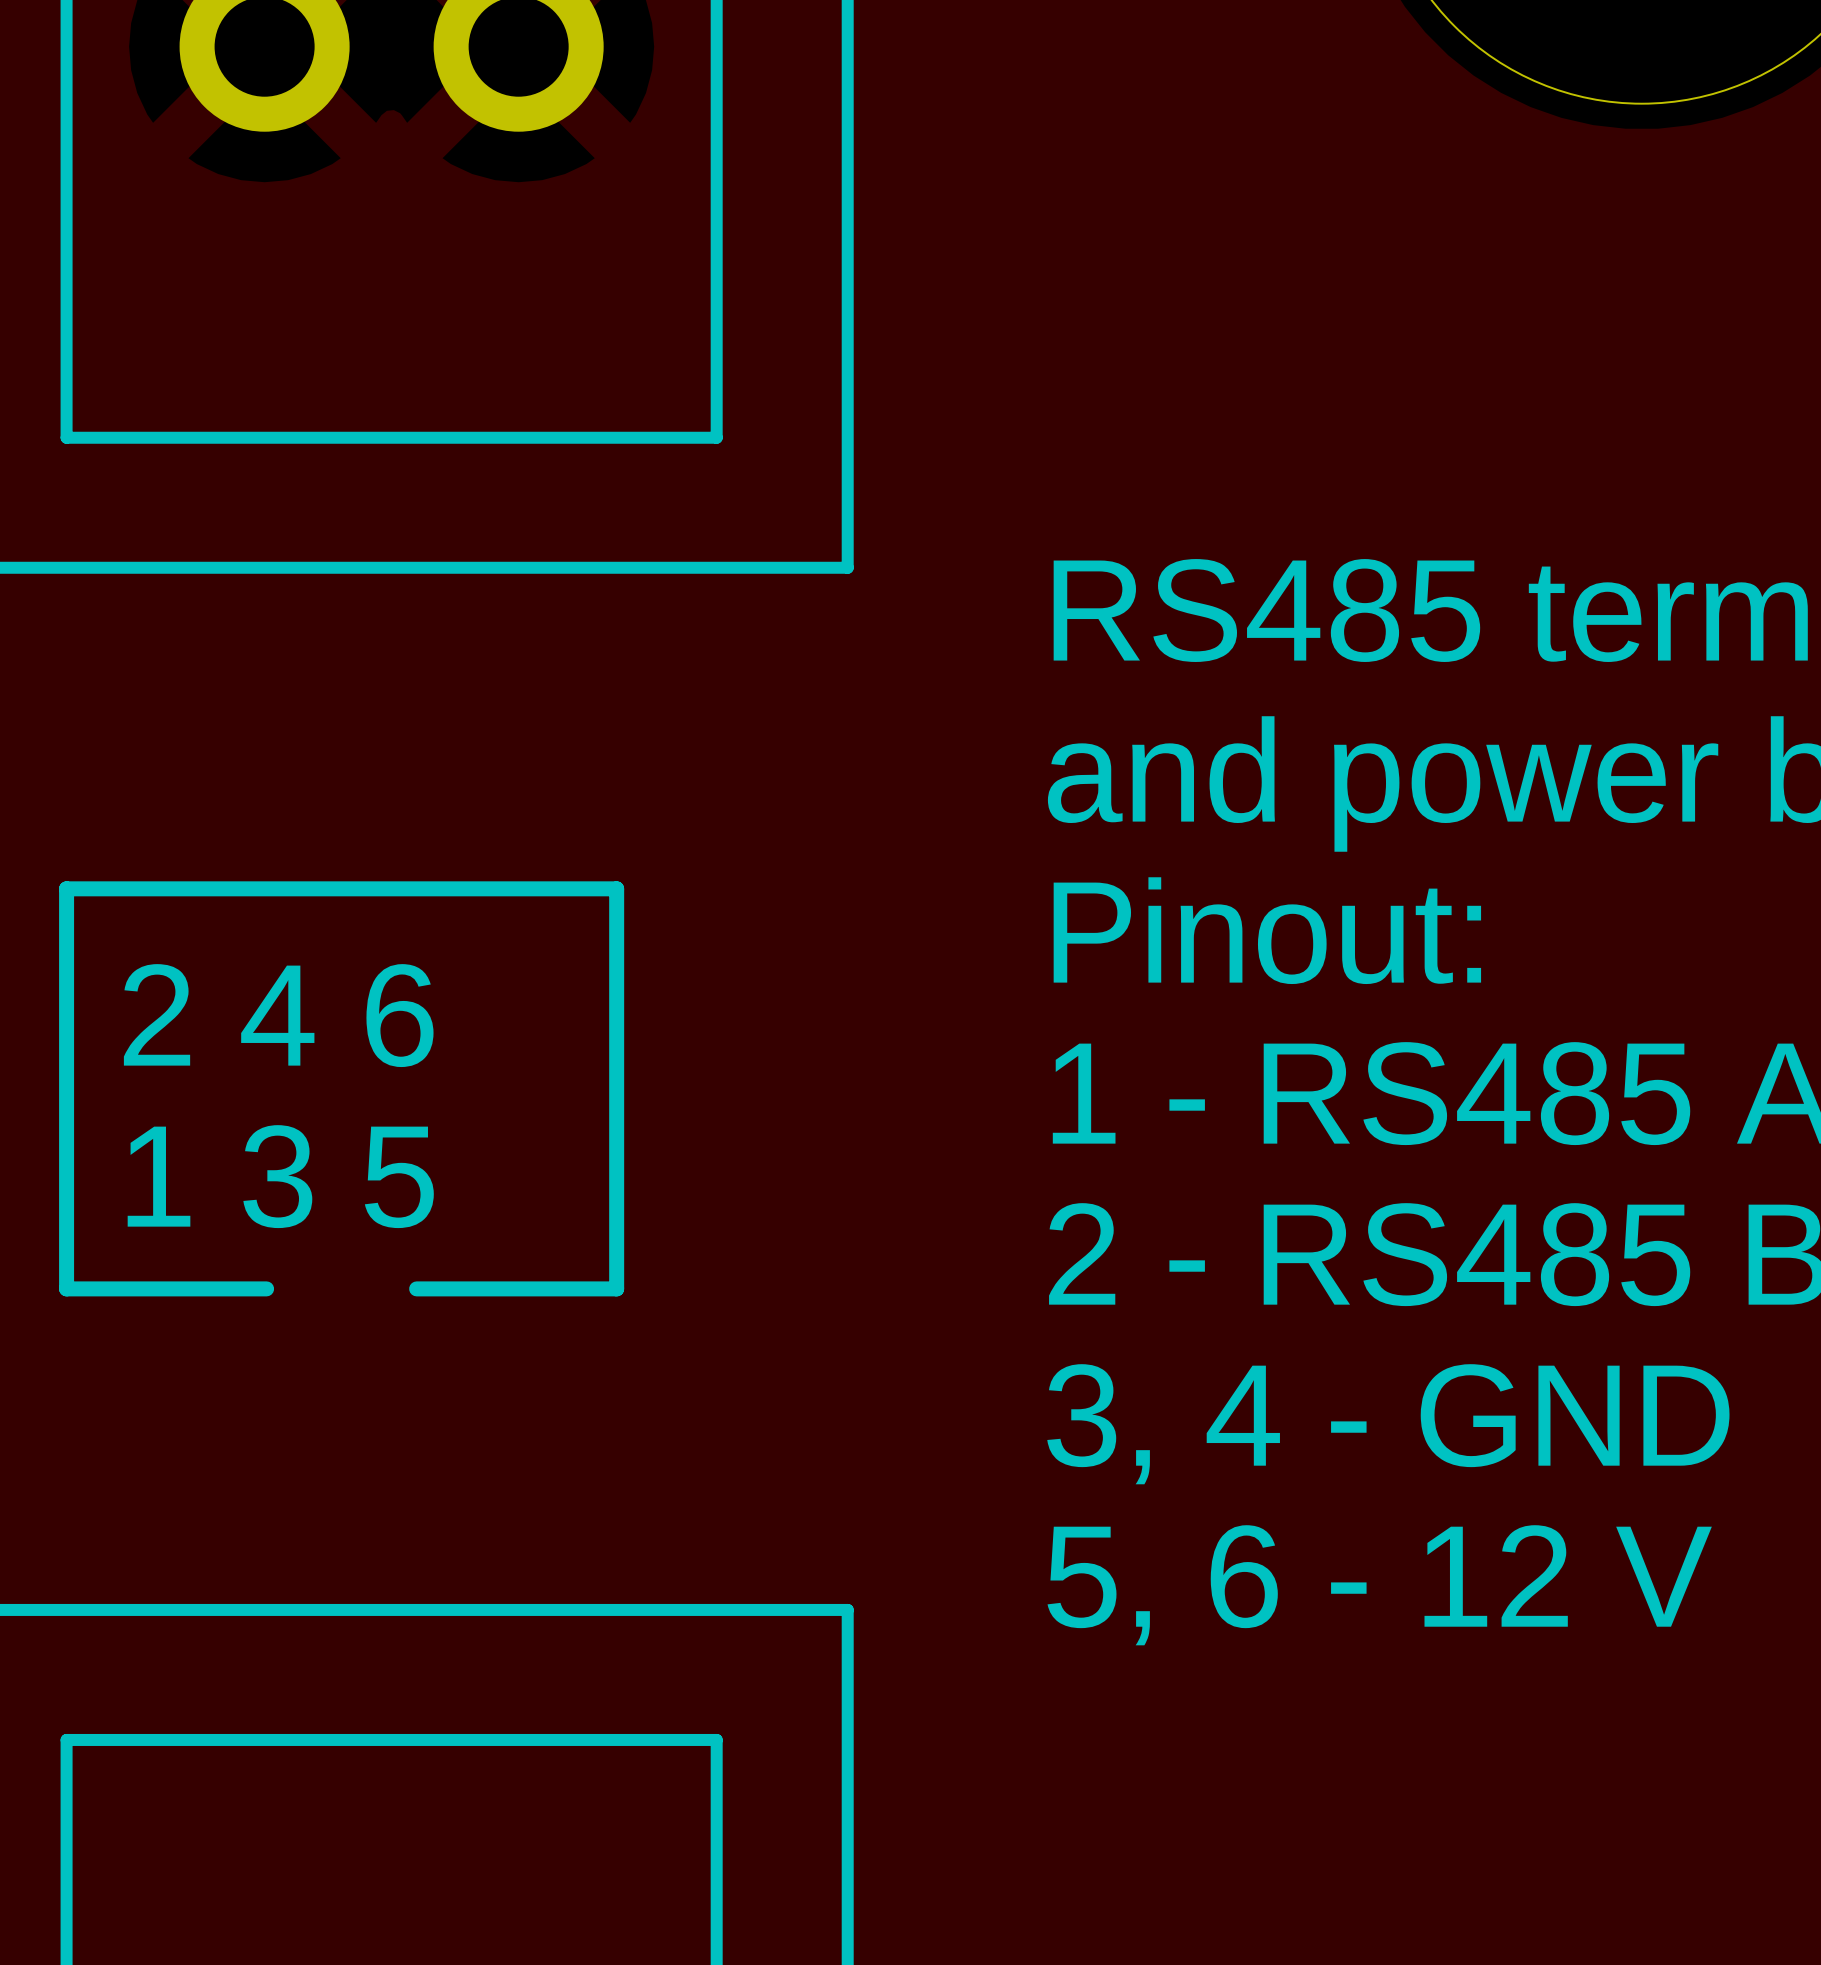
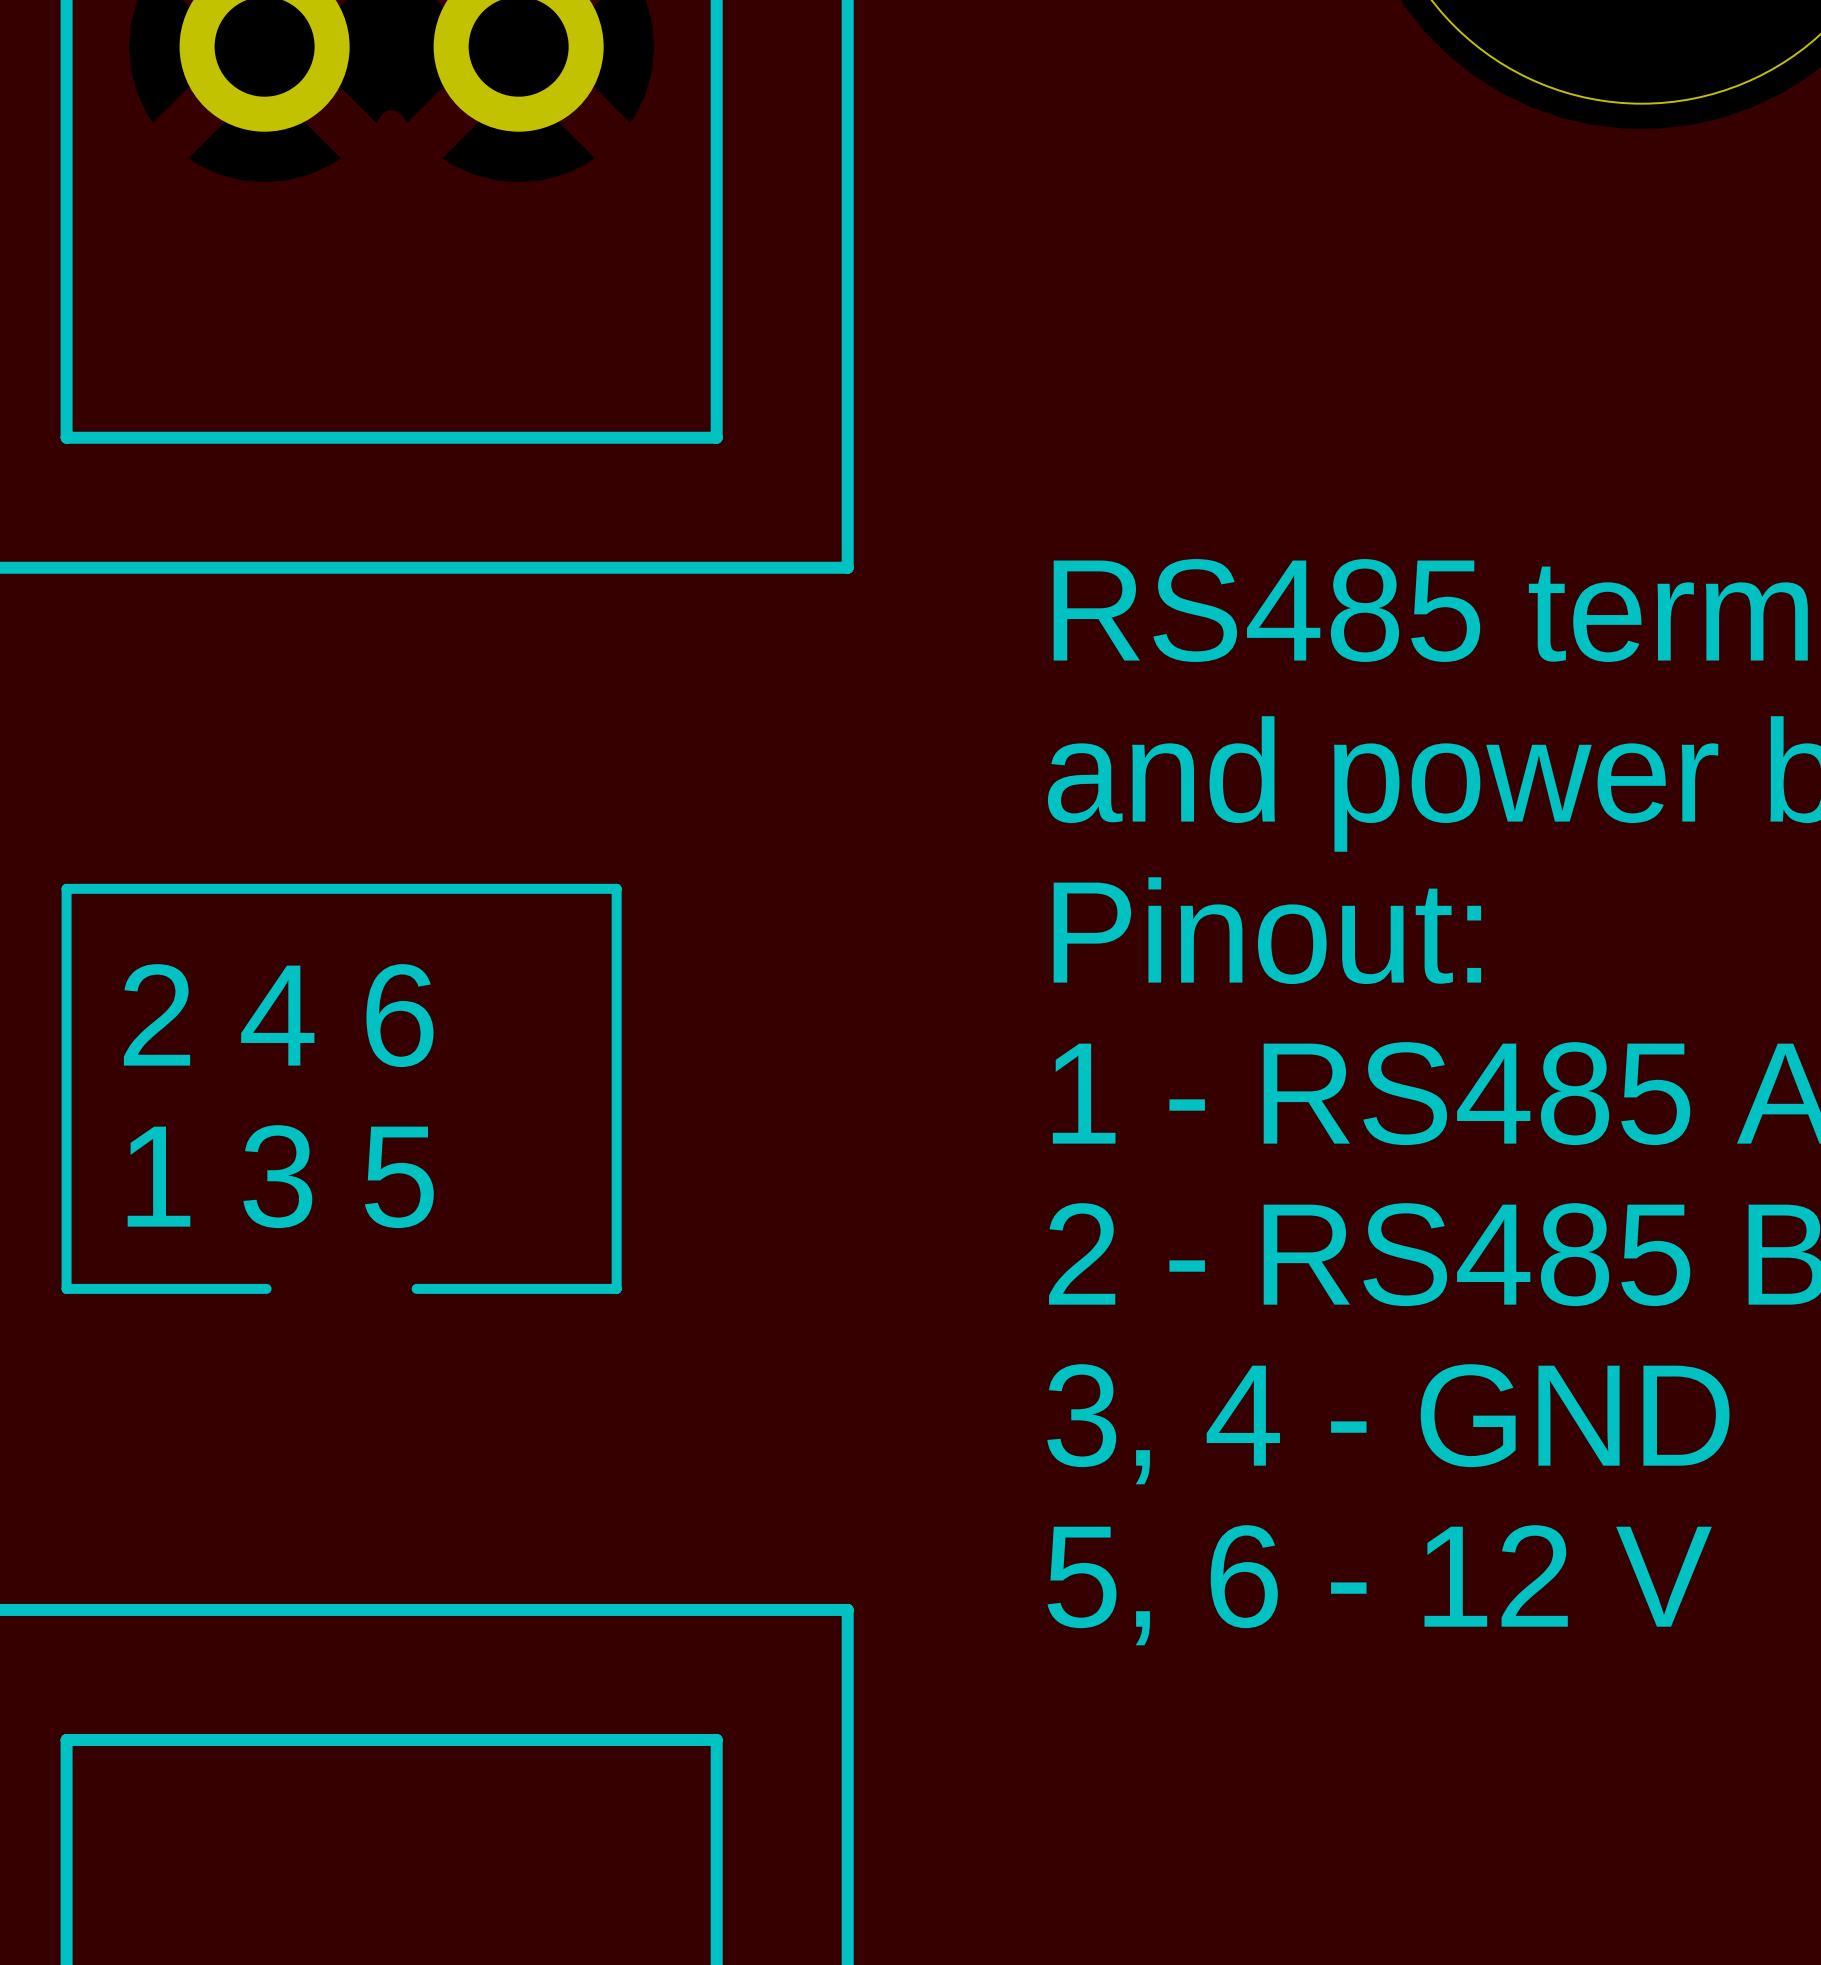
line width: thick (266, 1288) (66, 1288) (66, 888) (616, 888) (616, 1288) (416, 1288) -> thin (266, 1288) (66, 1288) (66, 888) (616, 888) (616, 1288) (416, 1288)

